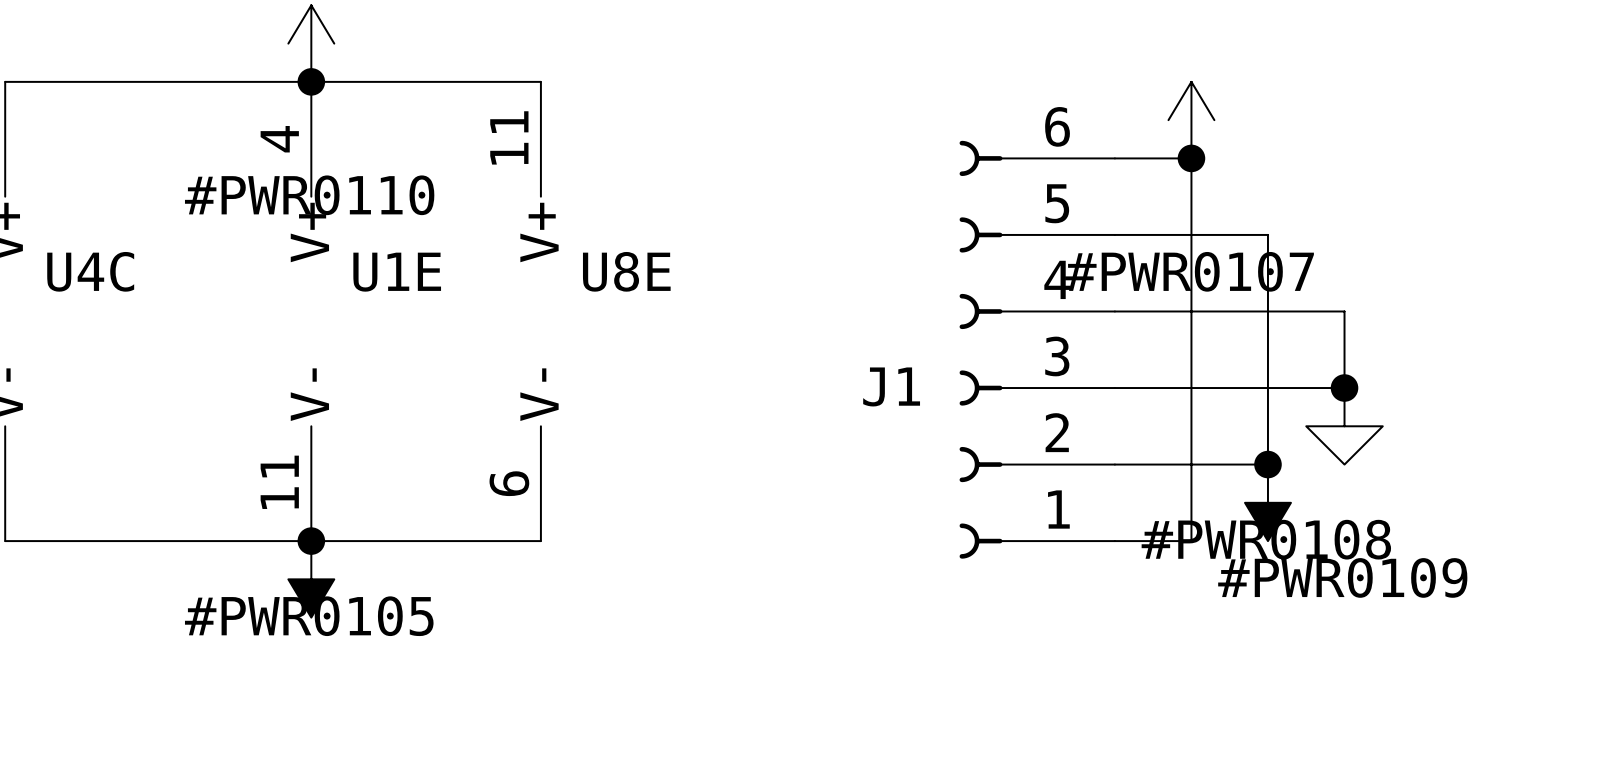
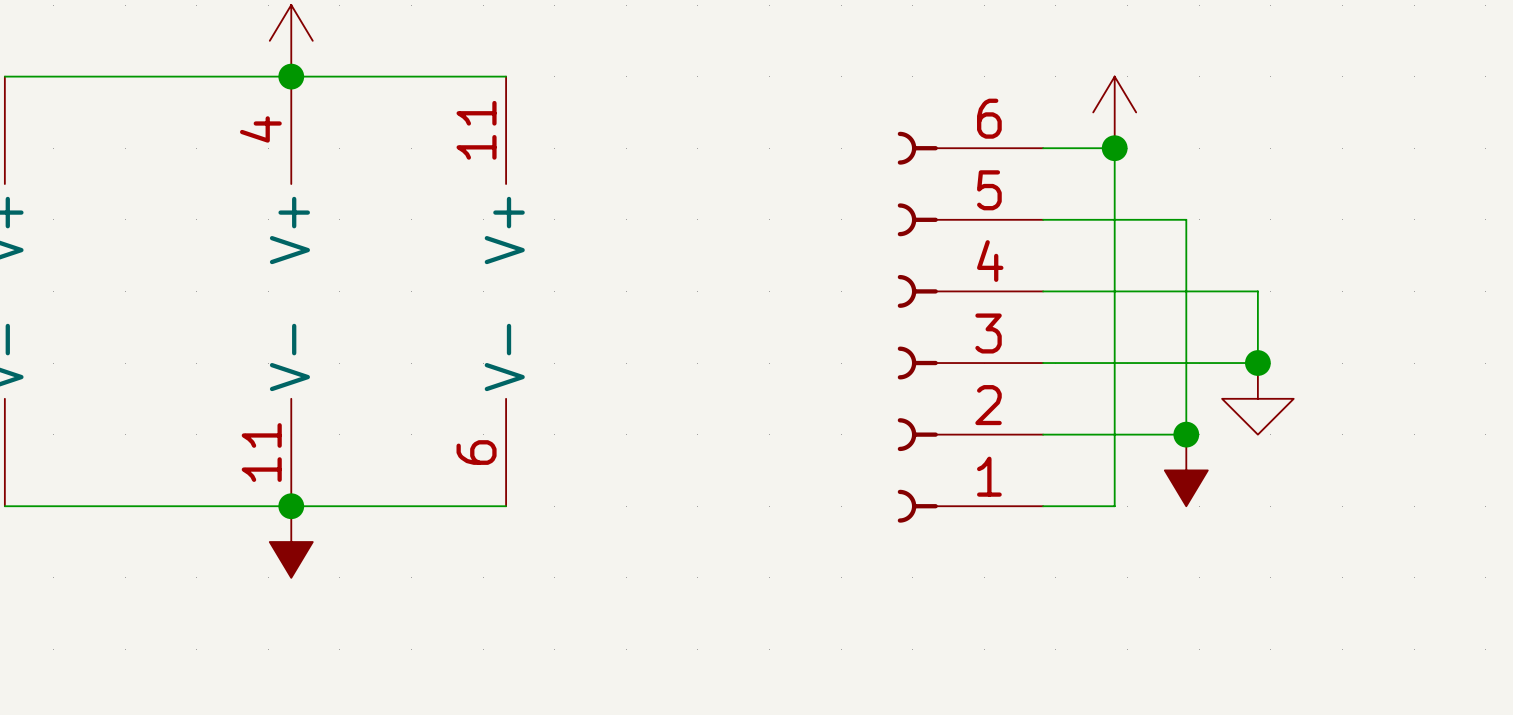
#PWR0110 name: #PWR0110 (309, 195) -> none
U4C name: U4C (90, 271) -> none
U8E name: U8E (626, 271) -> none
#PWR0107 name: #PWR0107 (1189, 271) -> none
U1E name: U1E (397, 272) -> none
J1 name: J1 (891, 386) -> none
#PWR0108 name: #PWR0108 (1266, 539) -> none
#PWR0109 name: #PWR0109 (1342, 577) -> none
#PWR0105 name: #PWR0105 (309, 616) -> none

